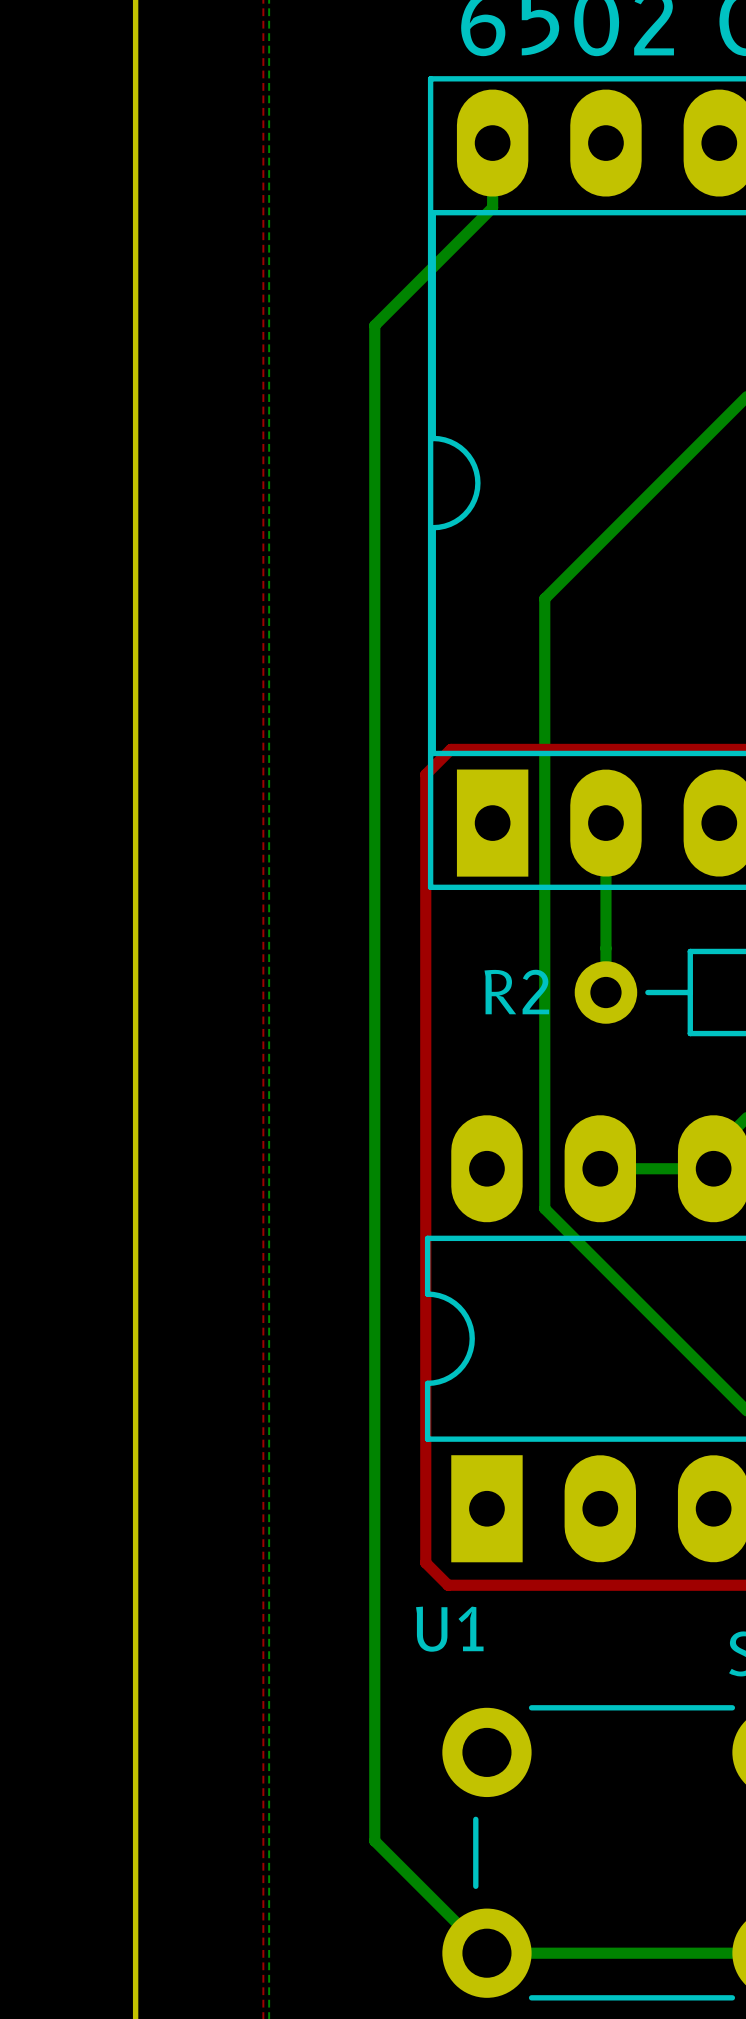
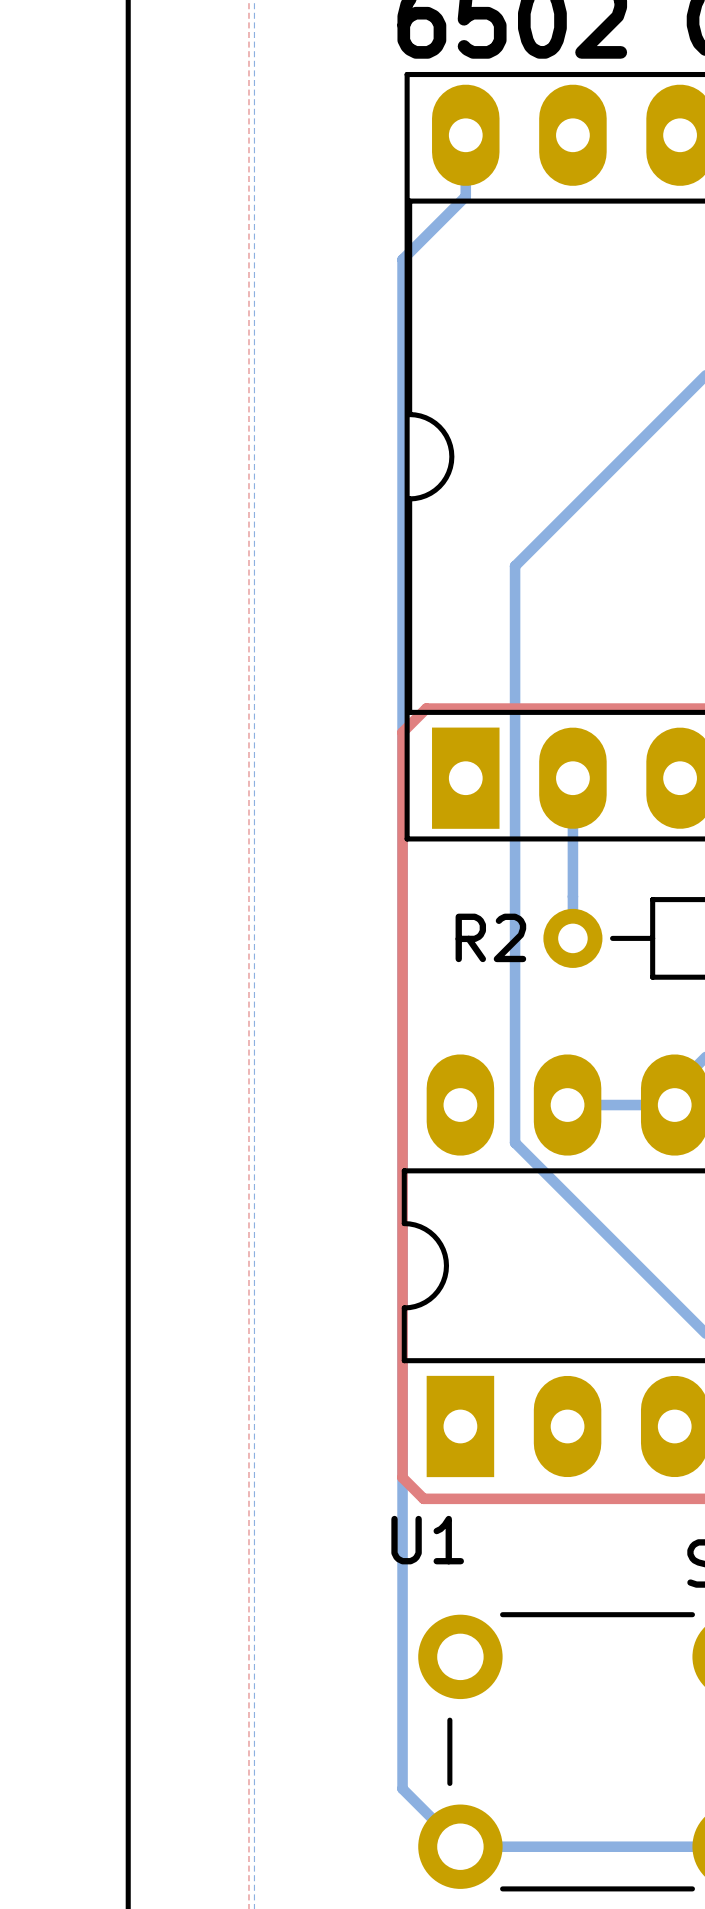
bottom track: (425, 274) (374, 325) (374, 1841) (425, 1892) -> (402, 259) (402, 1788)

